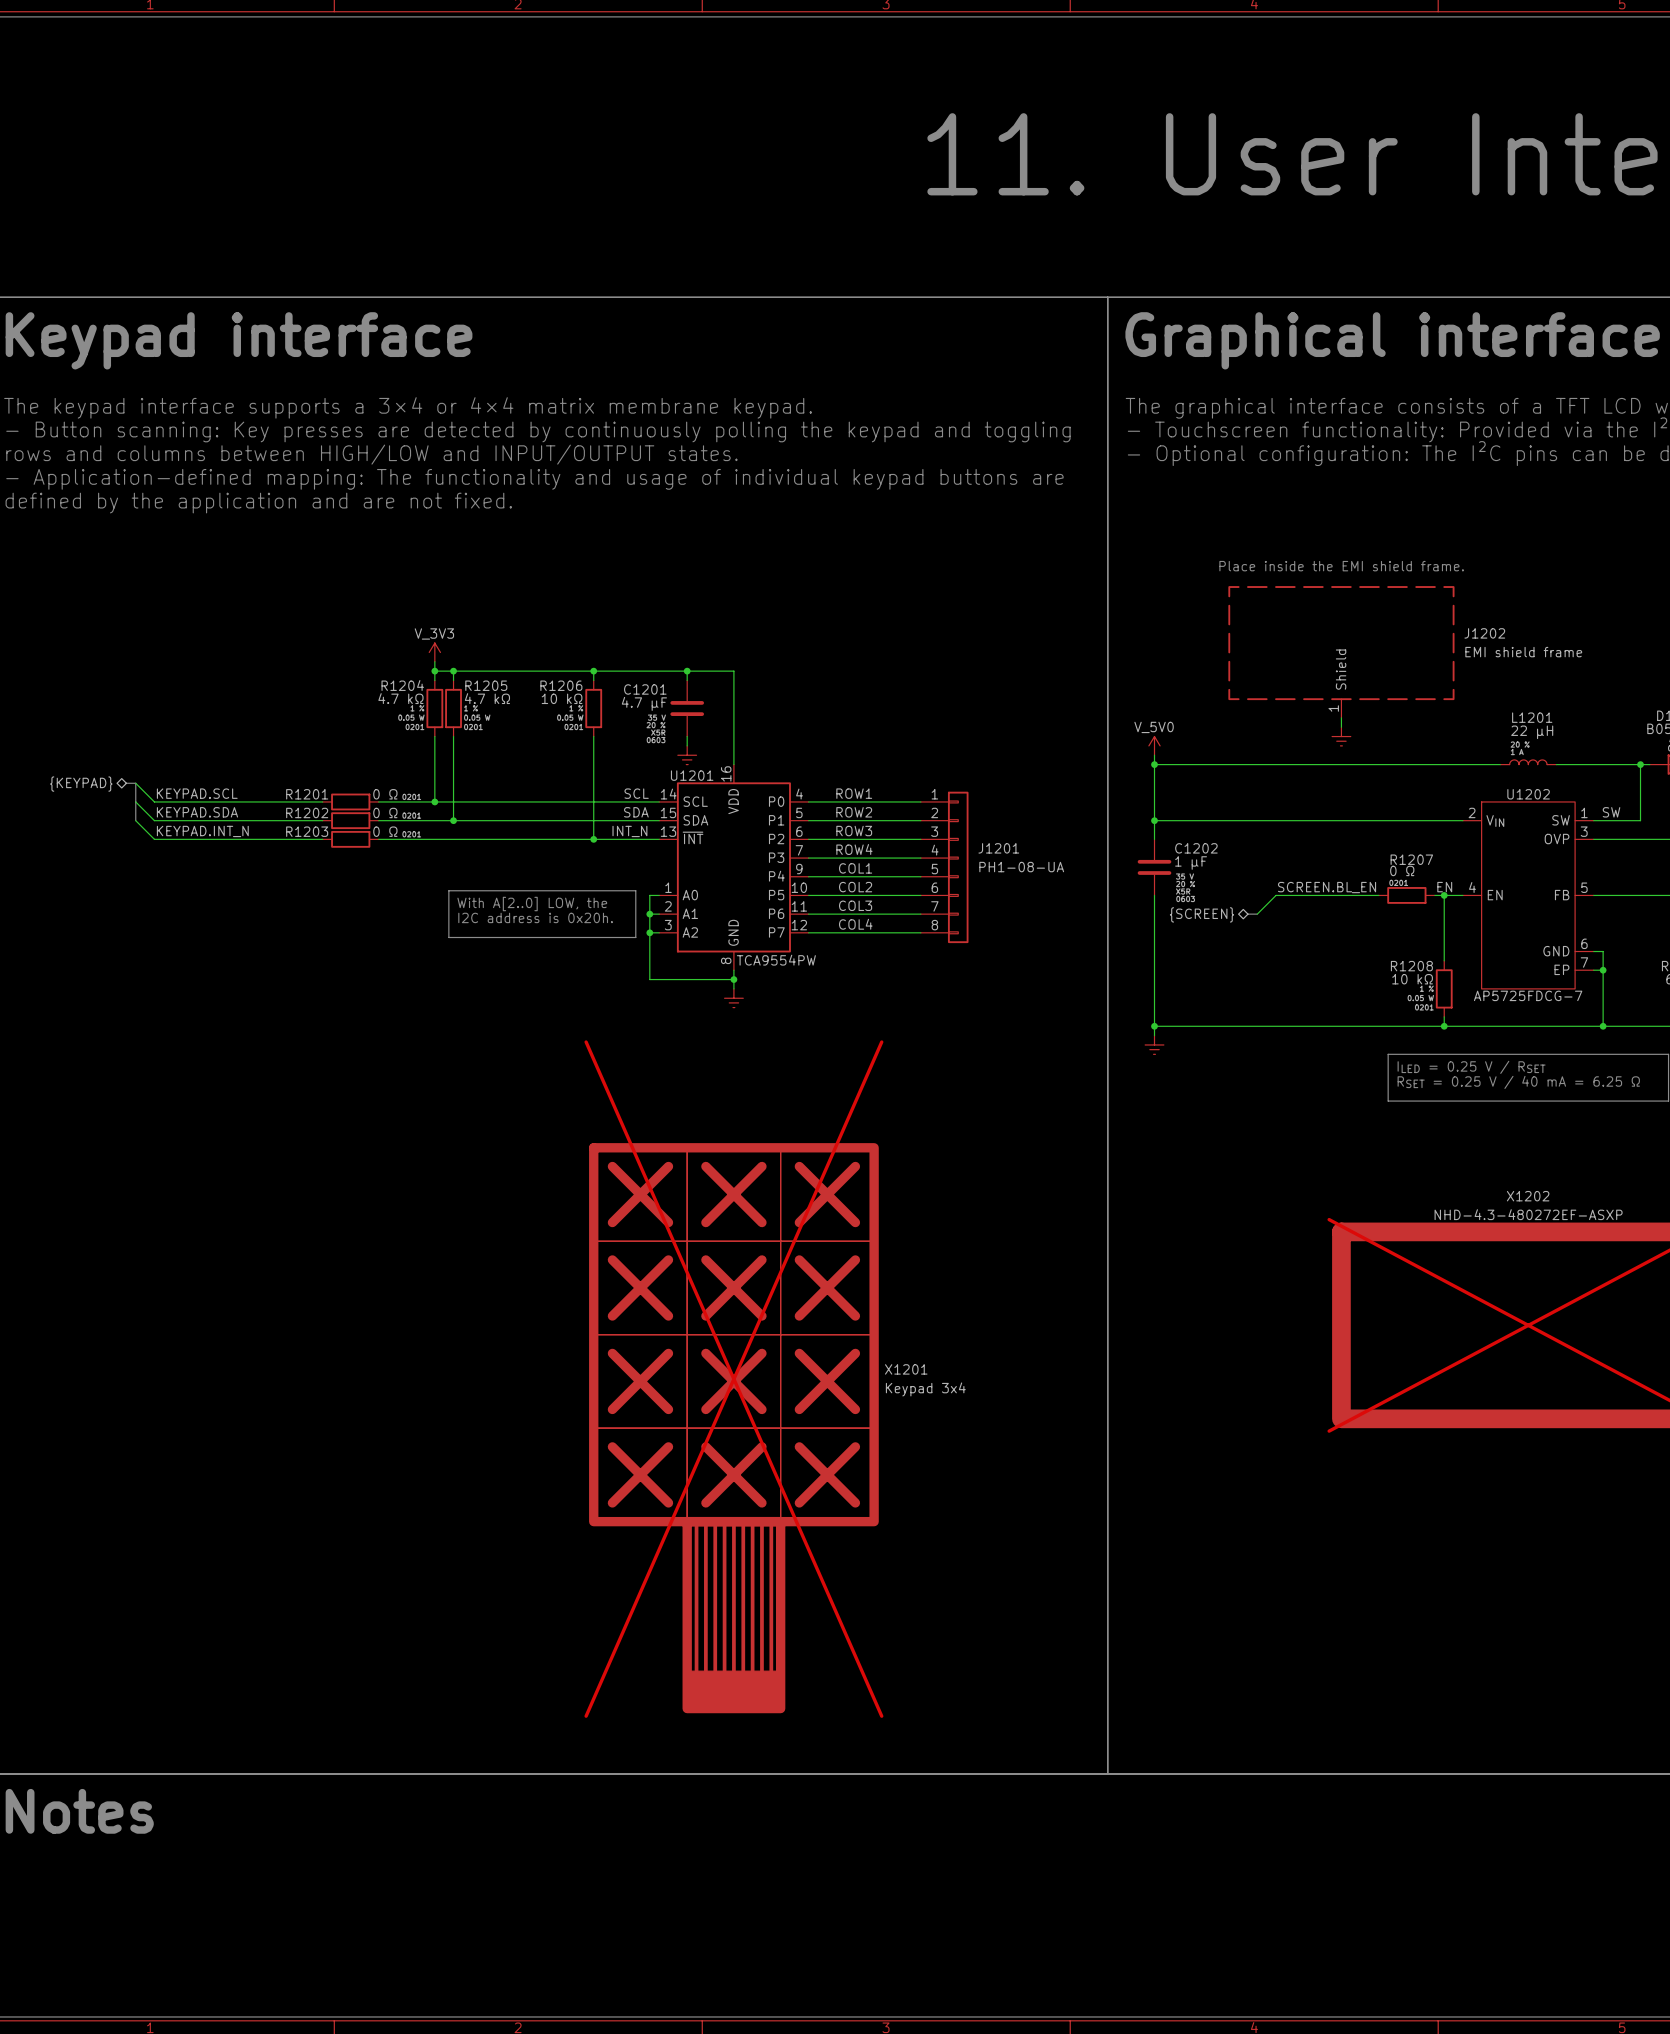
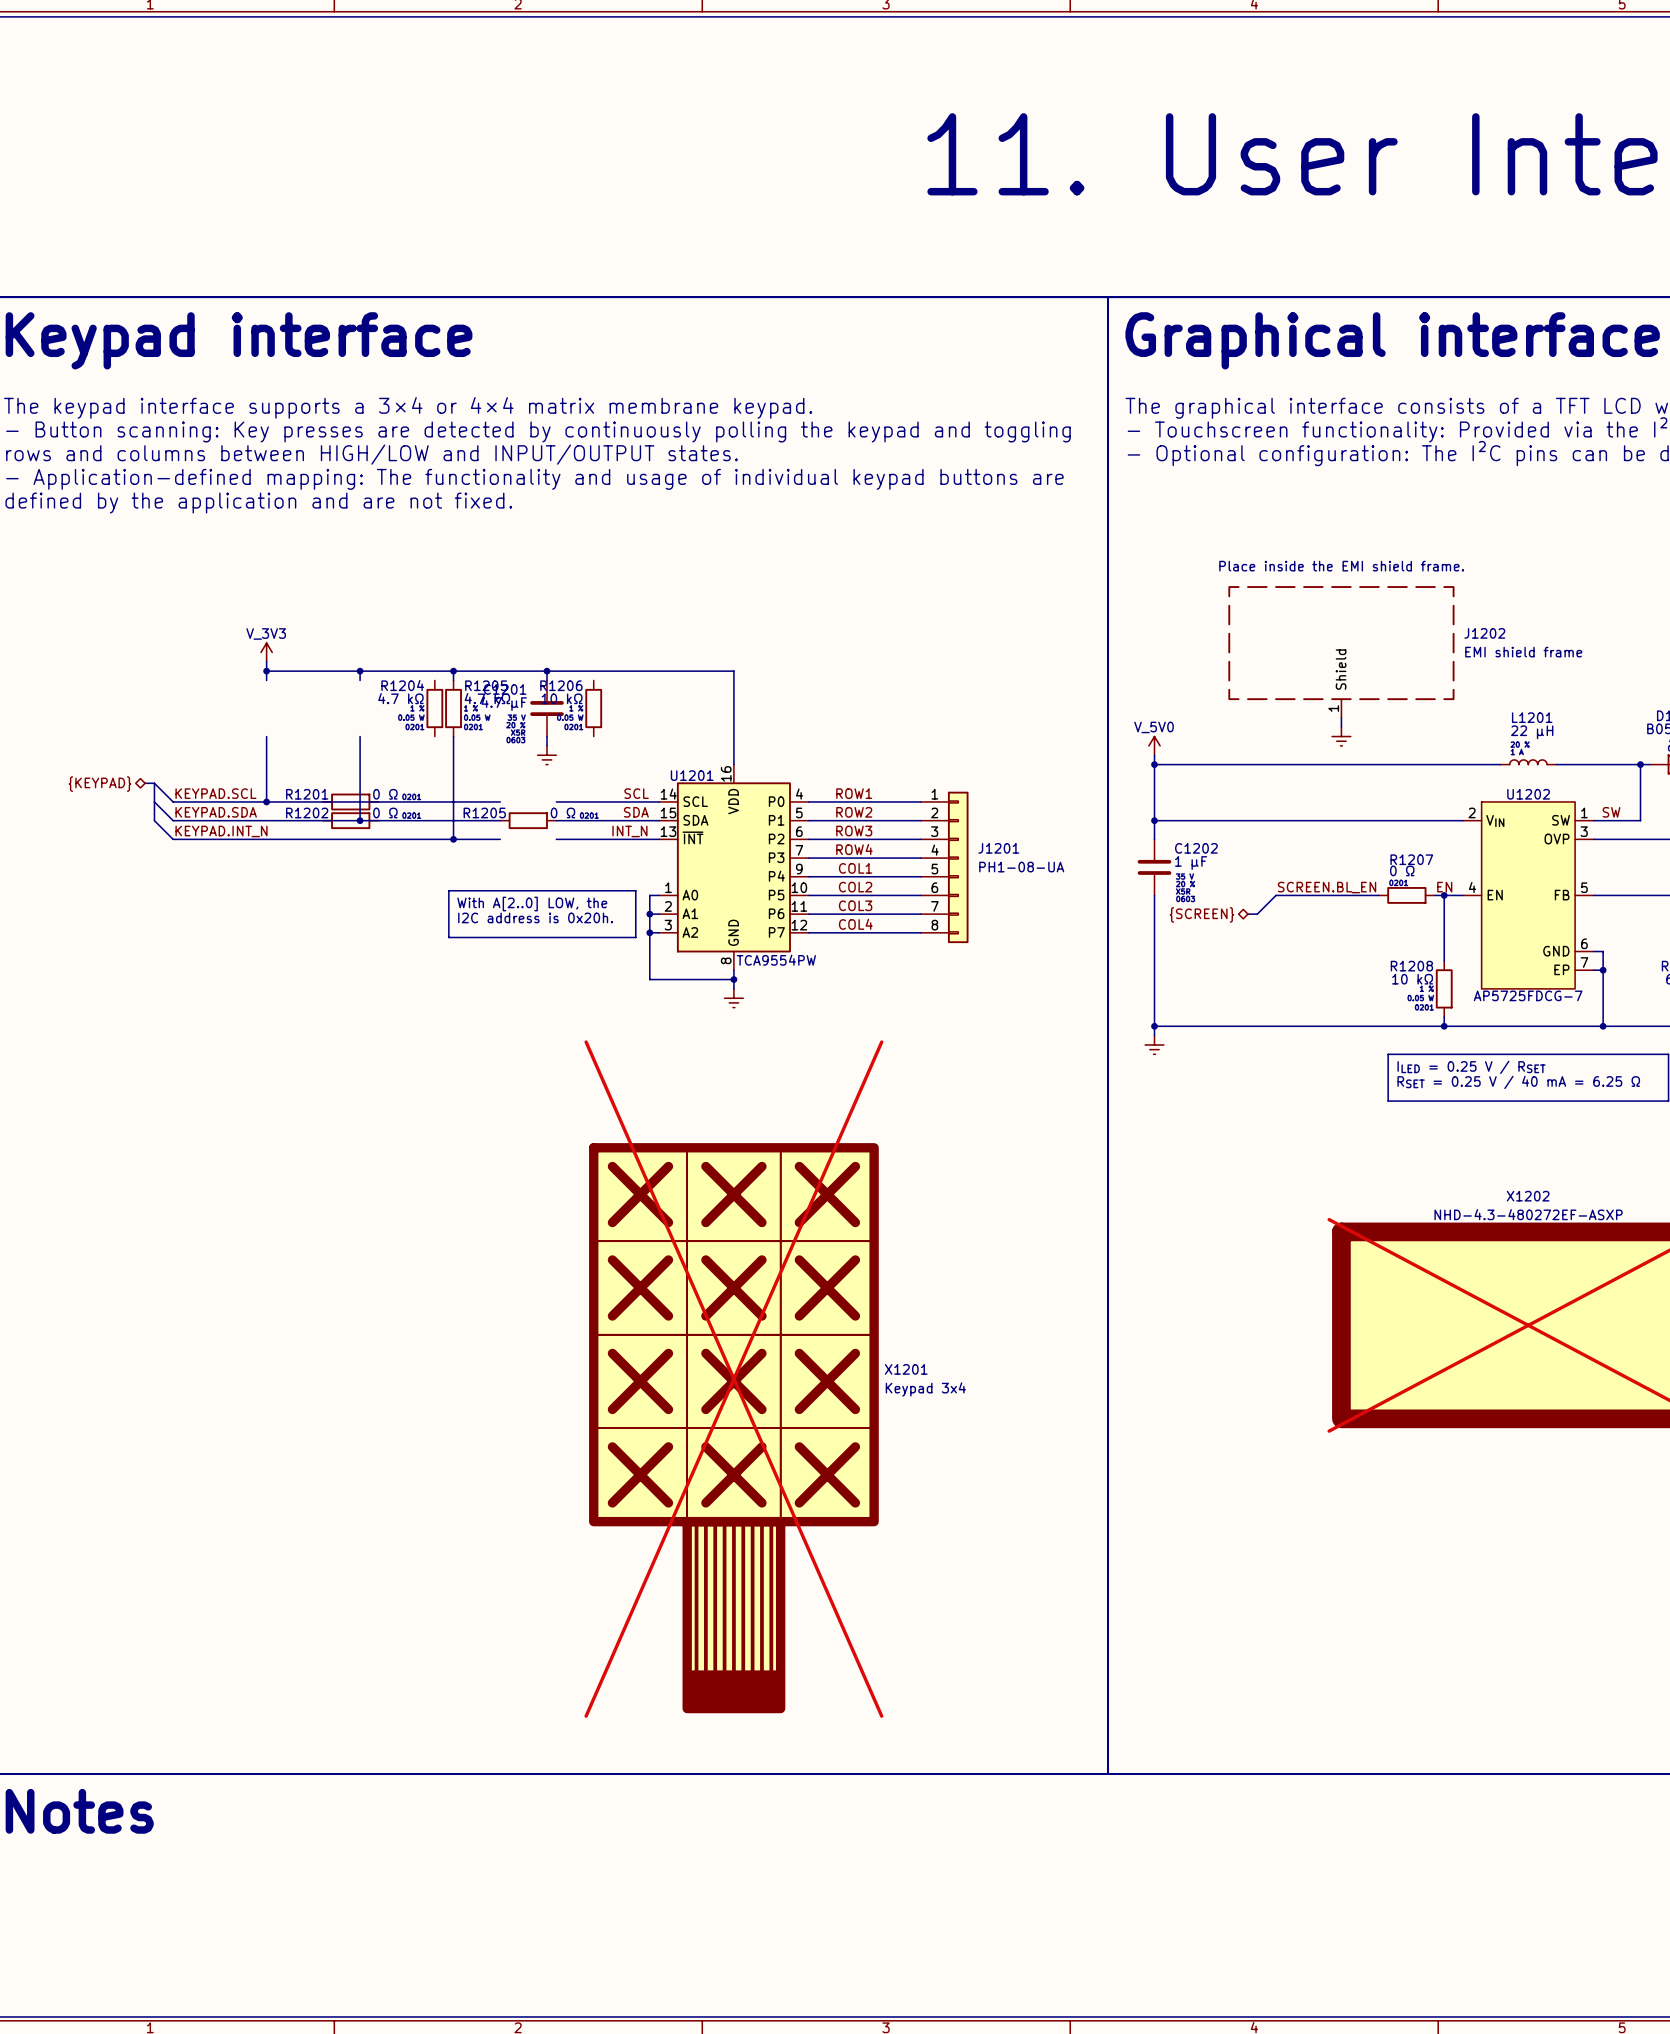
power symbol position: V_3V3 (434, 652) -> V_3V3 (266, 652)
wire: (434, 661) (434, 680) -> (266, 661) (266, 680)
wire: none -> (266, 671) (434, 671)
junction: none -> (266, 671)
wire: none -> (360, 671) (360, 680)
junction: none -> (360, 671)
junction: (434, 671) -> none
junction: none -> (547, 671)
wire: (593, 671) (593, 680) -> none
junction: (593, 671) -> none
wire: (687, 671) (687, 680) -> (547, 671) (547, 680)
junction: (687, 671) -> none
C1201 position: (687, 708) -> (547, 708)
wire: none -> (360, 736) (360, 820)
wire: (434, 736) (434, 801) -> (266, 736) (266, 801)
wire: (593, 736) (593, 839) -> none
wire: (687, 736) (687, 745) -> (547, 736) (547, 745)
power symbol position: (687, 755) -> (547, 755)
bus: (126, 783) (135, 783) (135, 820) -> (145, 783) (154, 783) (154, 820)
wire: (135, 783) (154, 801) (173, 801) -> (154, 783) (173, 801)
hierarchical label position: {KEYPAD} (81, 784) -> {KEYPAD} (100, 784)
label position: KEYPAD.SCL (197, 793) -> KEYPAD.SCL (215, 793)
wire: (135, 801) (154, 820) (173, 820) -> (154, 801) (173, 820)
junction: none -> (266, 801)
junction: (434, 801) -> none
wire: (500, 801) (556, 801) -> (322, 801) (378, 801)
label position: KEYPAD.SDA (197, 812) -> KEYPAD.SDA (216, 812)
wire: (135, 820) (154, 839) (173, 839) -> (154, 820) (173, 839)
junction: none -> (360, 820)
wire: none -> (453, 820) (453, 839)
junction position: (453, 820) -> (453, 839)
wire: (500, 820) (556, 820) -> (322, 820) (378, 820)
R1205: none -> 0 Ω (528, 820)
label position: KEYPAD.INT_N (202, 831) -> KEYPAD.INT_N (221, 831)
R1203: 0 Ω (350, 839) -> none
wire: (500, 839) (556, 839) -> (322, 839) (378, 839)
junction: (593, 839) -> none

